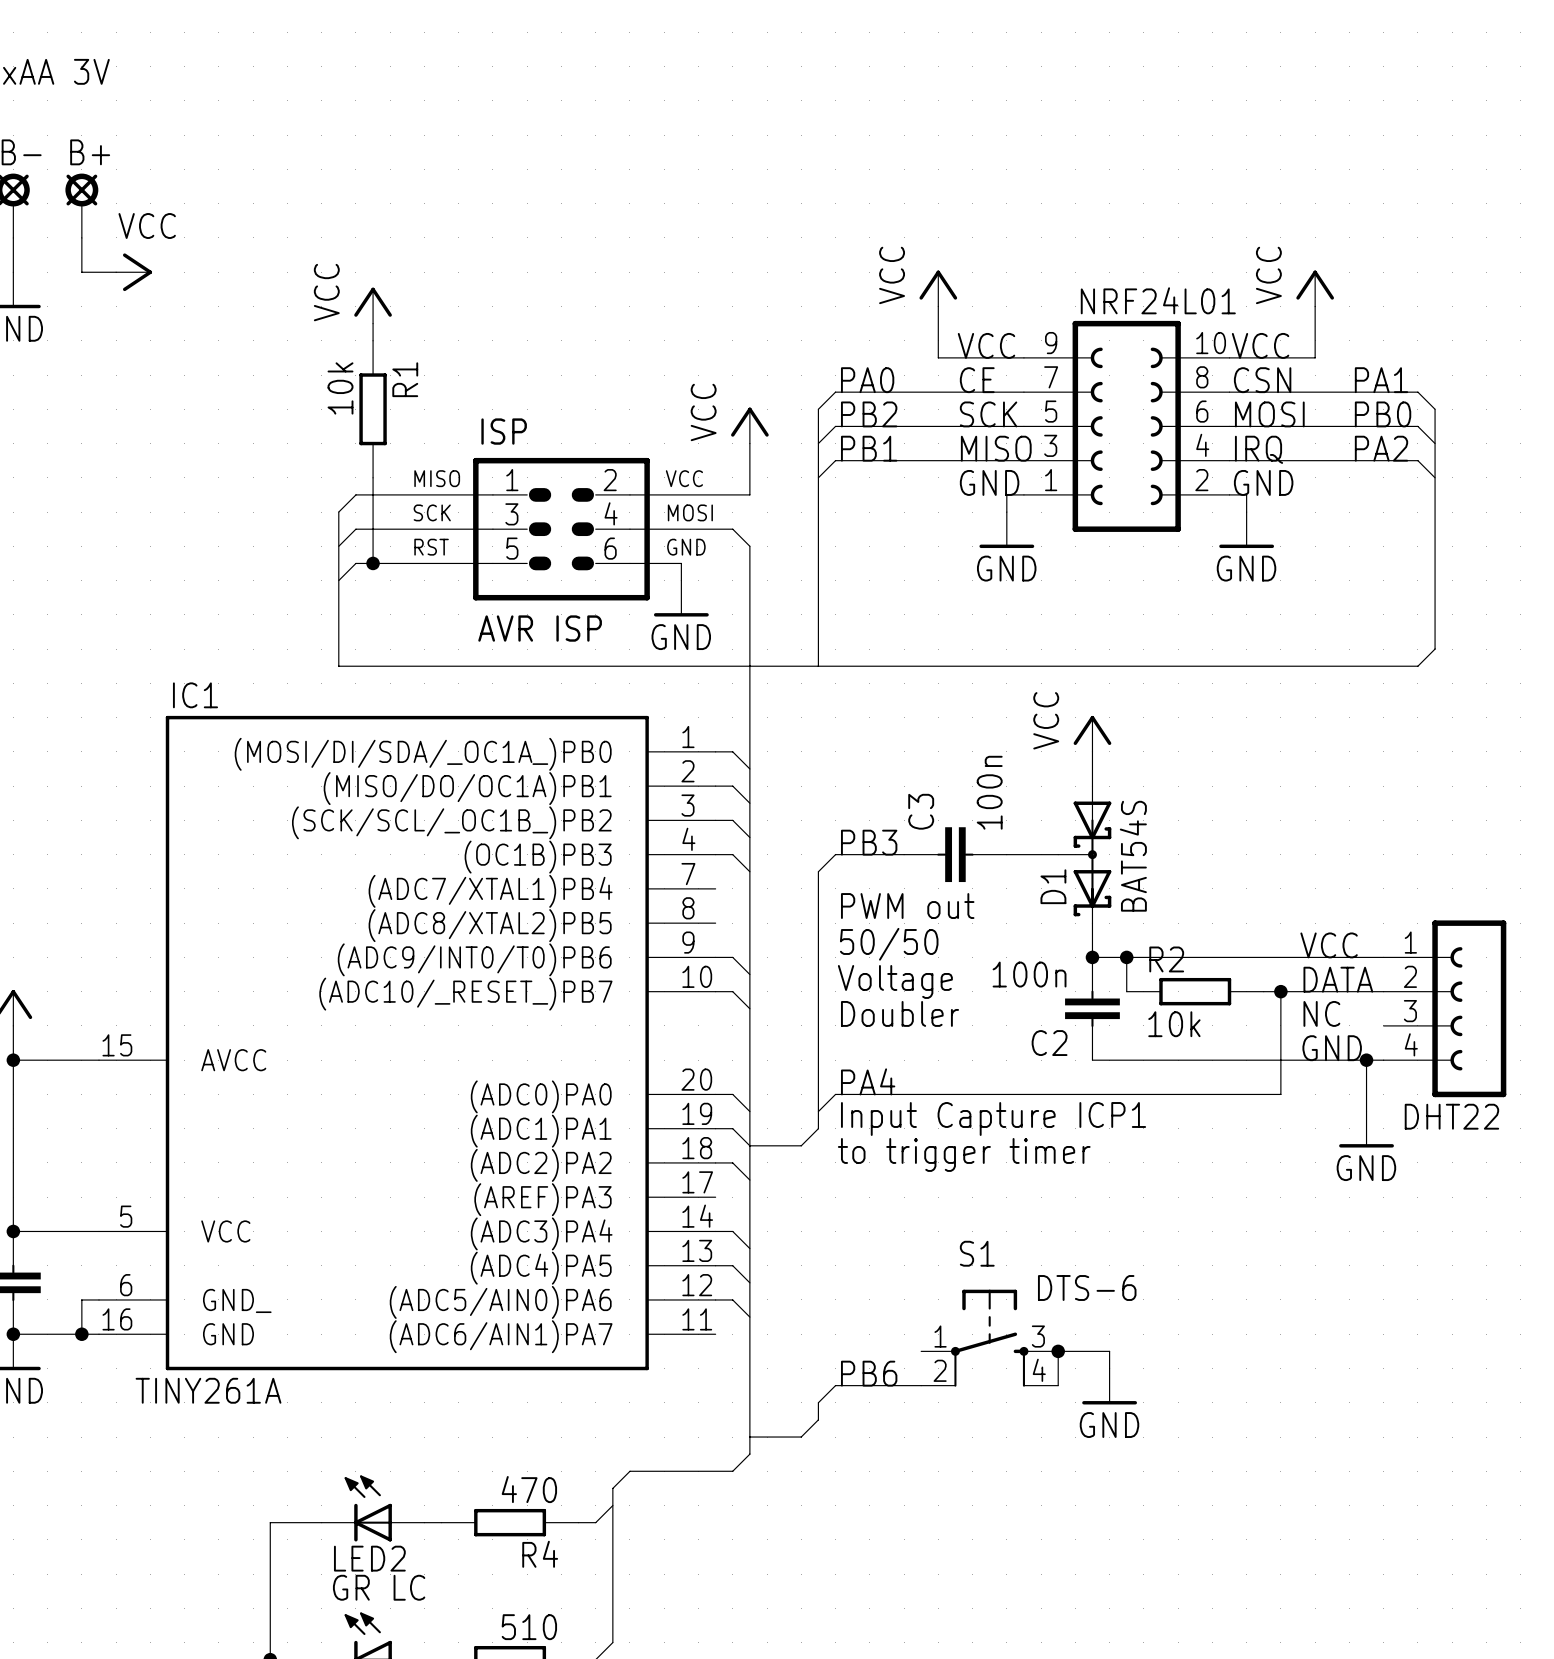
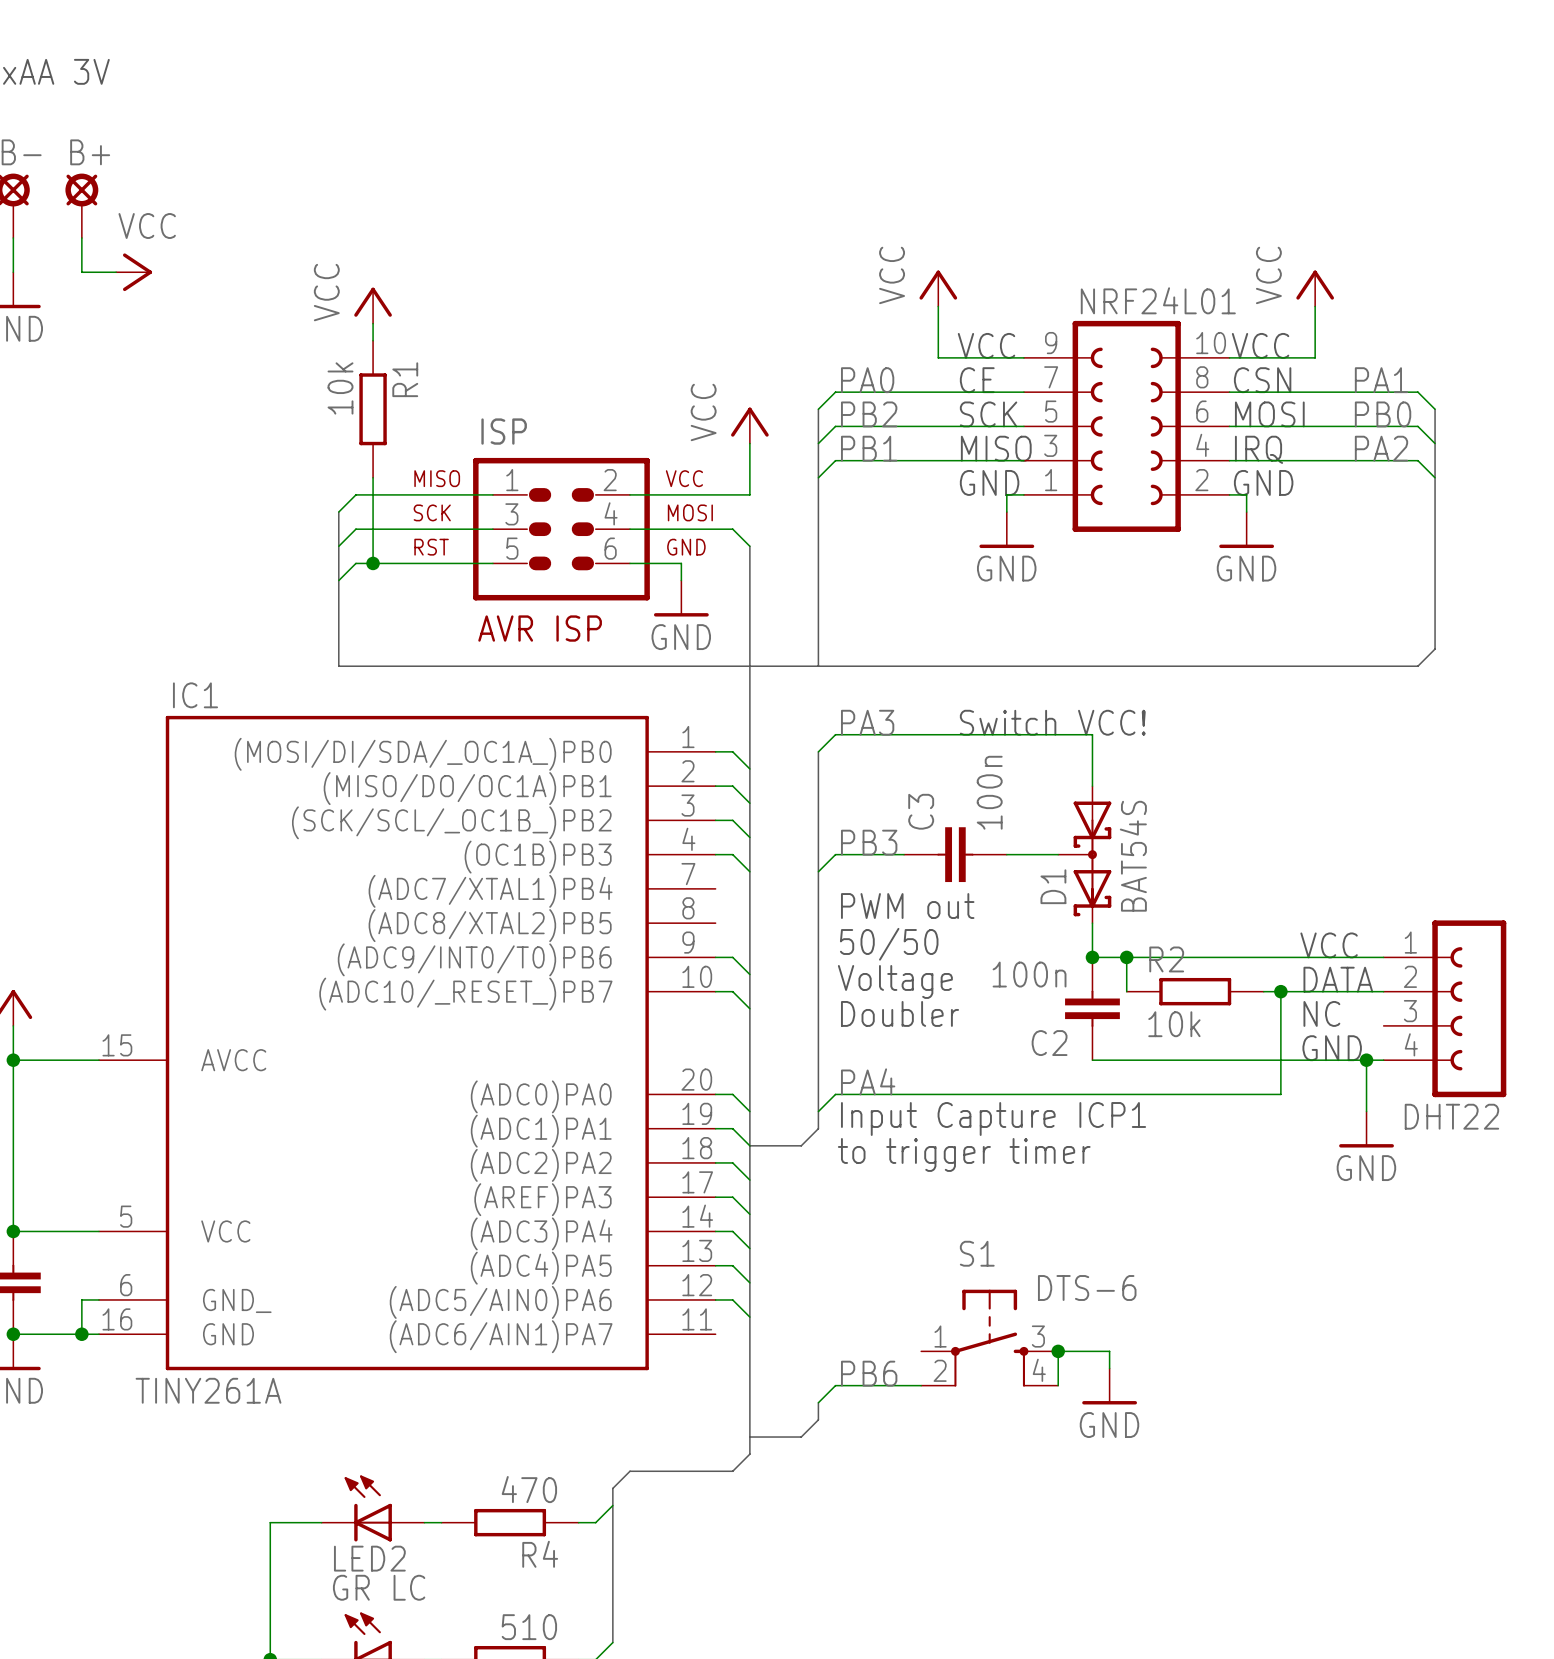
label: none -> PA3 (867, 722)
text: none -> Switch VCC! (1052, 722)
power symbol: VCC (1092, 733) -> none
bus: none -> (818, 751) (818, 871)
wire: none -> (818, 751) (835, 734) (1092, 734) (1092, 751)
wire: none -> (715, 1197) (732, 1197) (749, 1214)

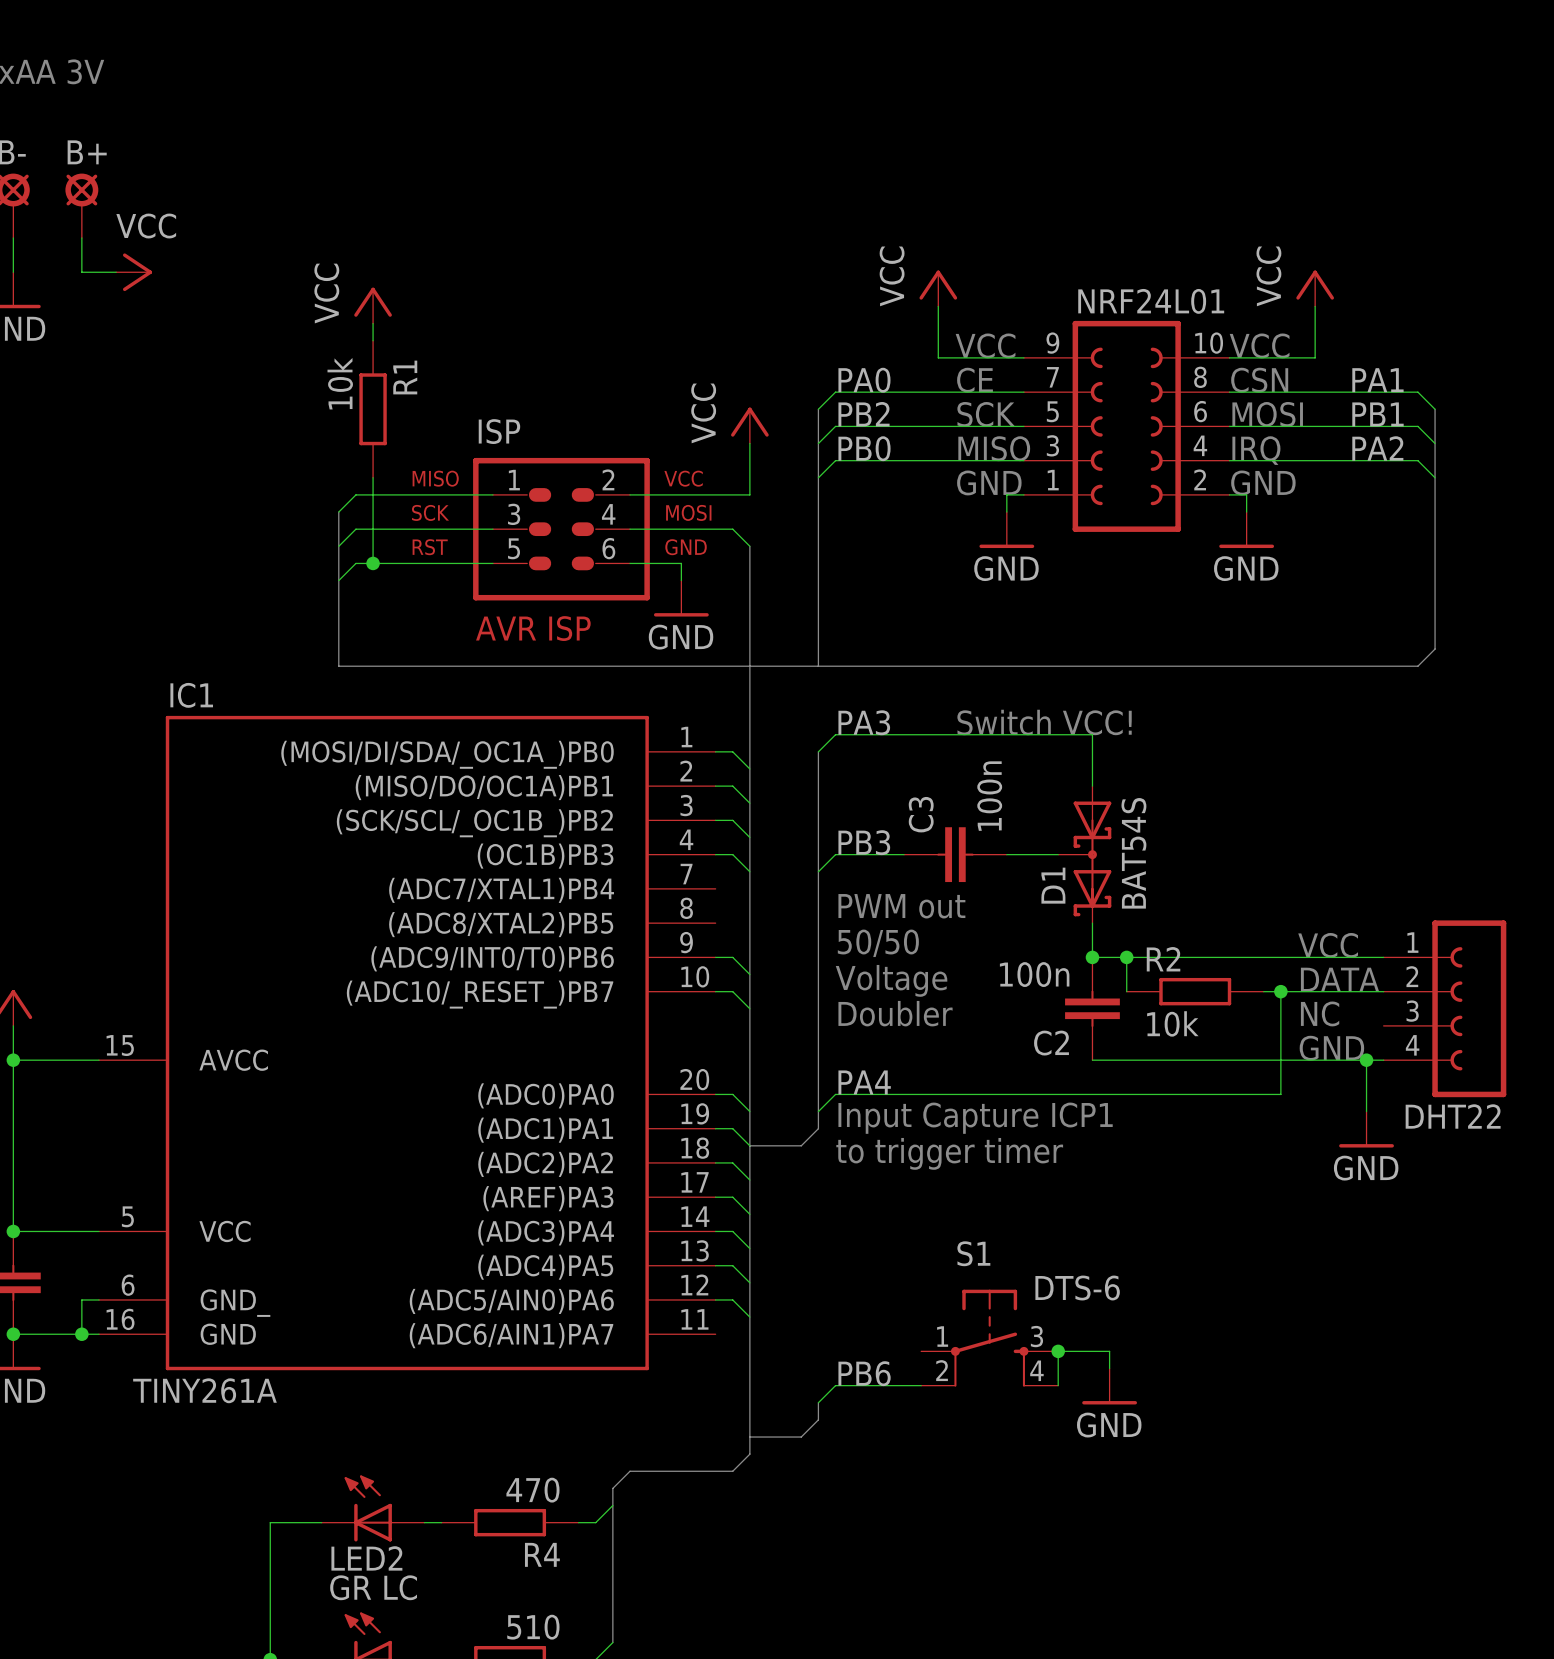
label: PB0 (1383, 414) -> PB1 (1377, 414)
label: PB1 (869, 448) -> PB0 (864, 448)

